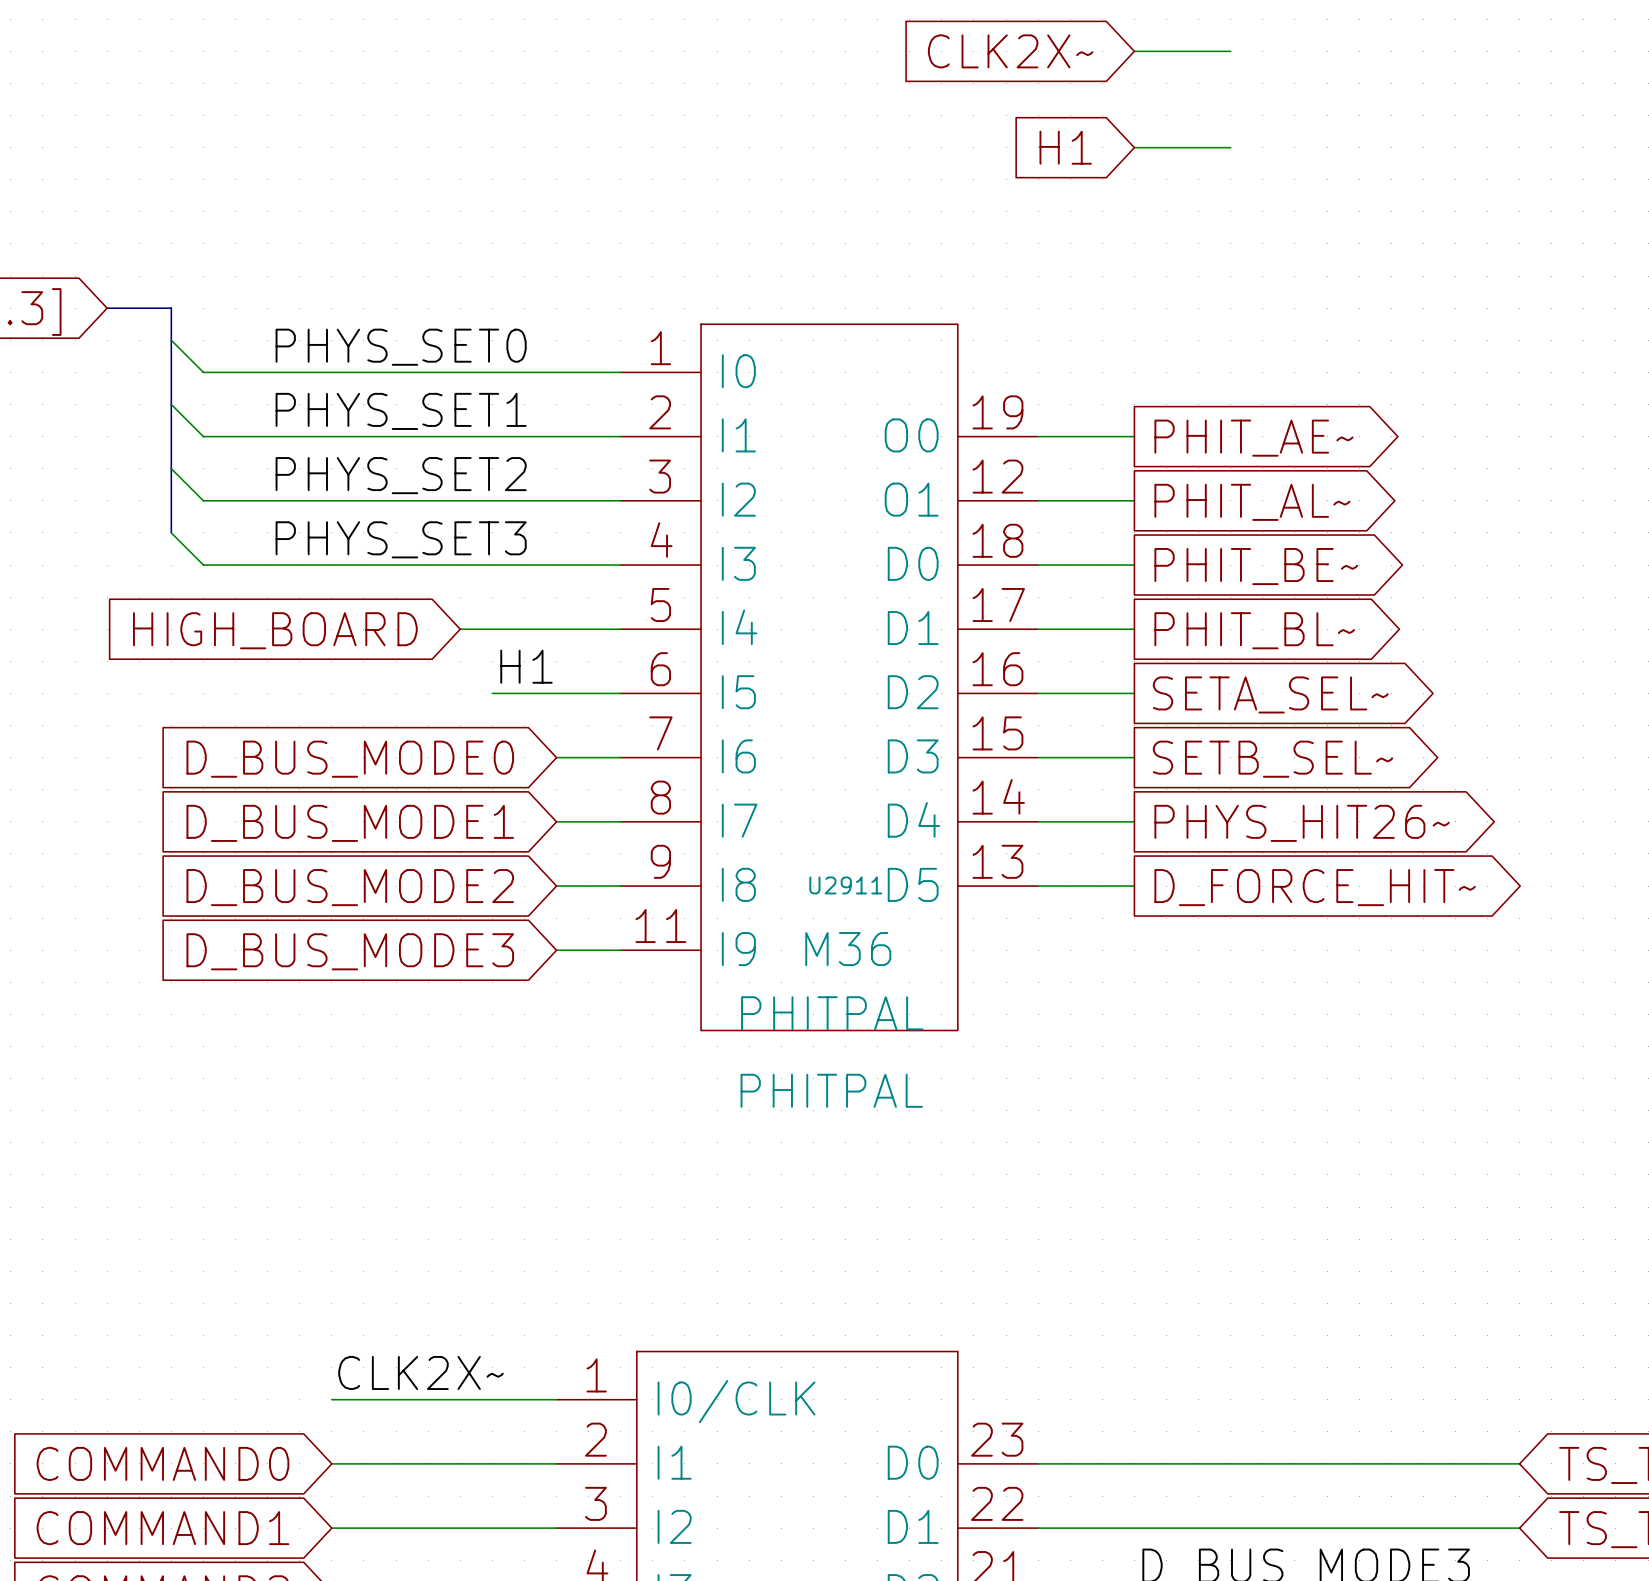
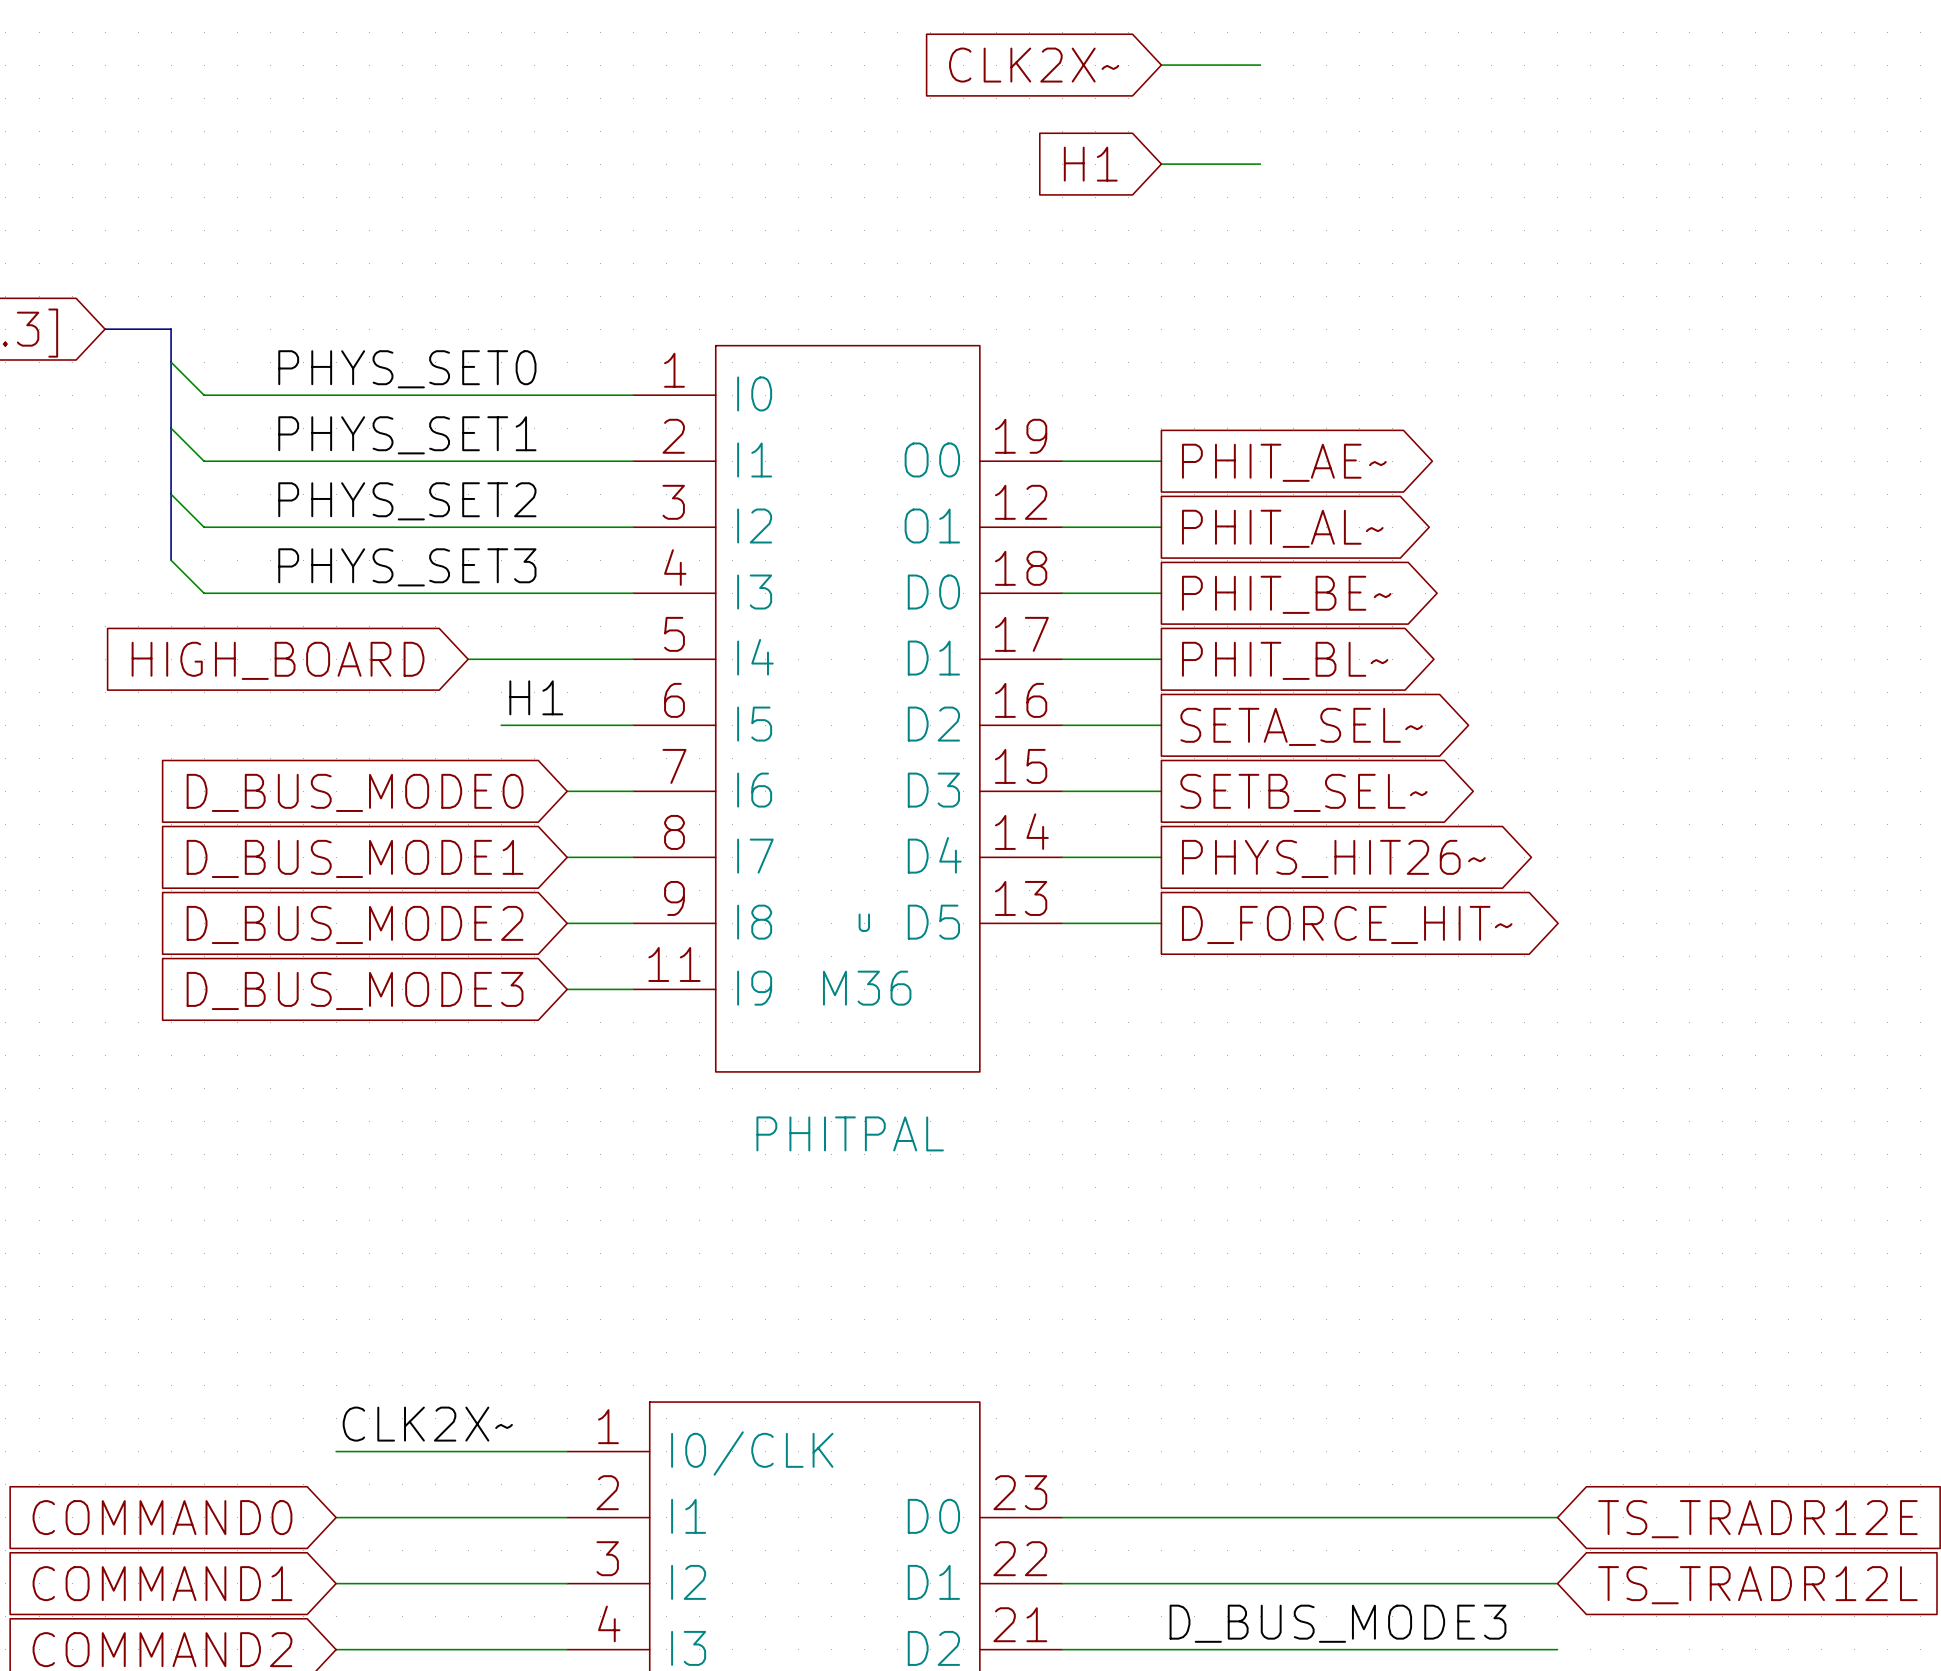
U2911 name: U2911 (845, 885) -> U (864, 922)
U2911 value: PHITPAL (832, 1013) -> none

